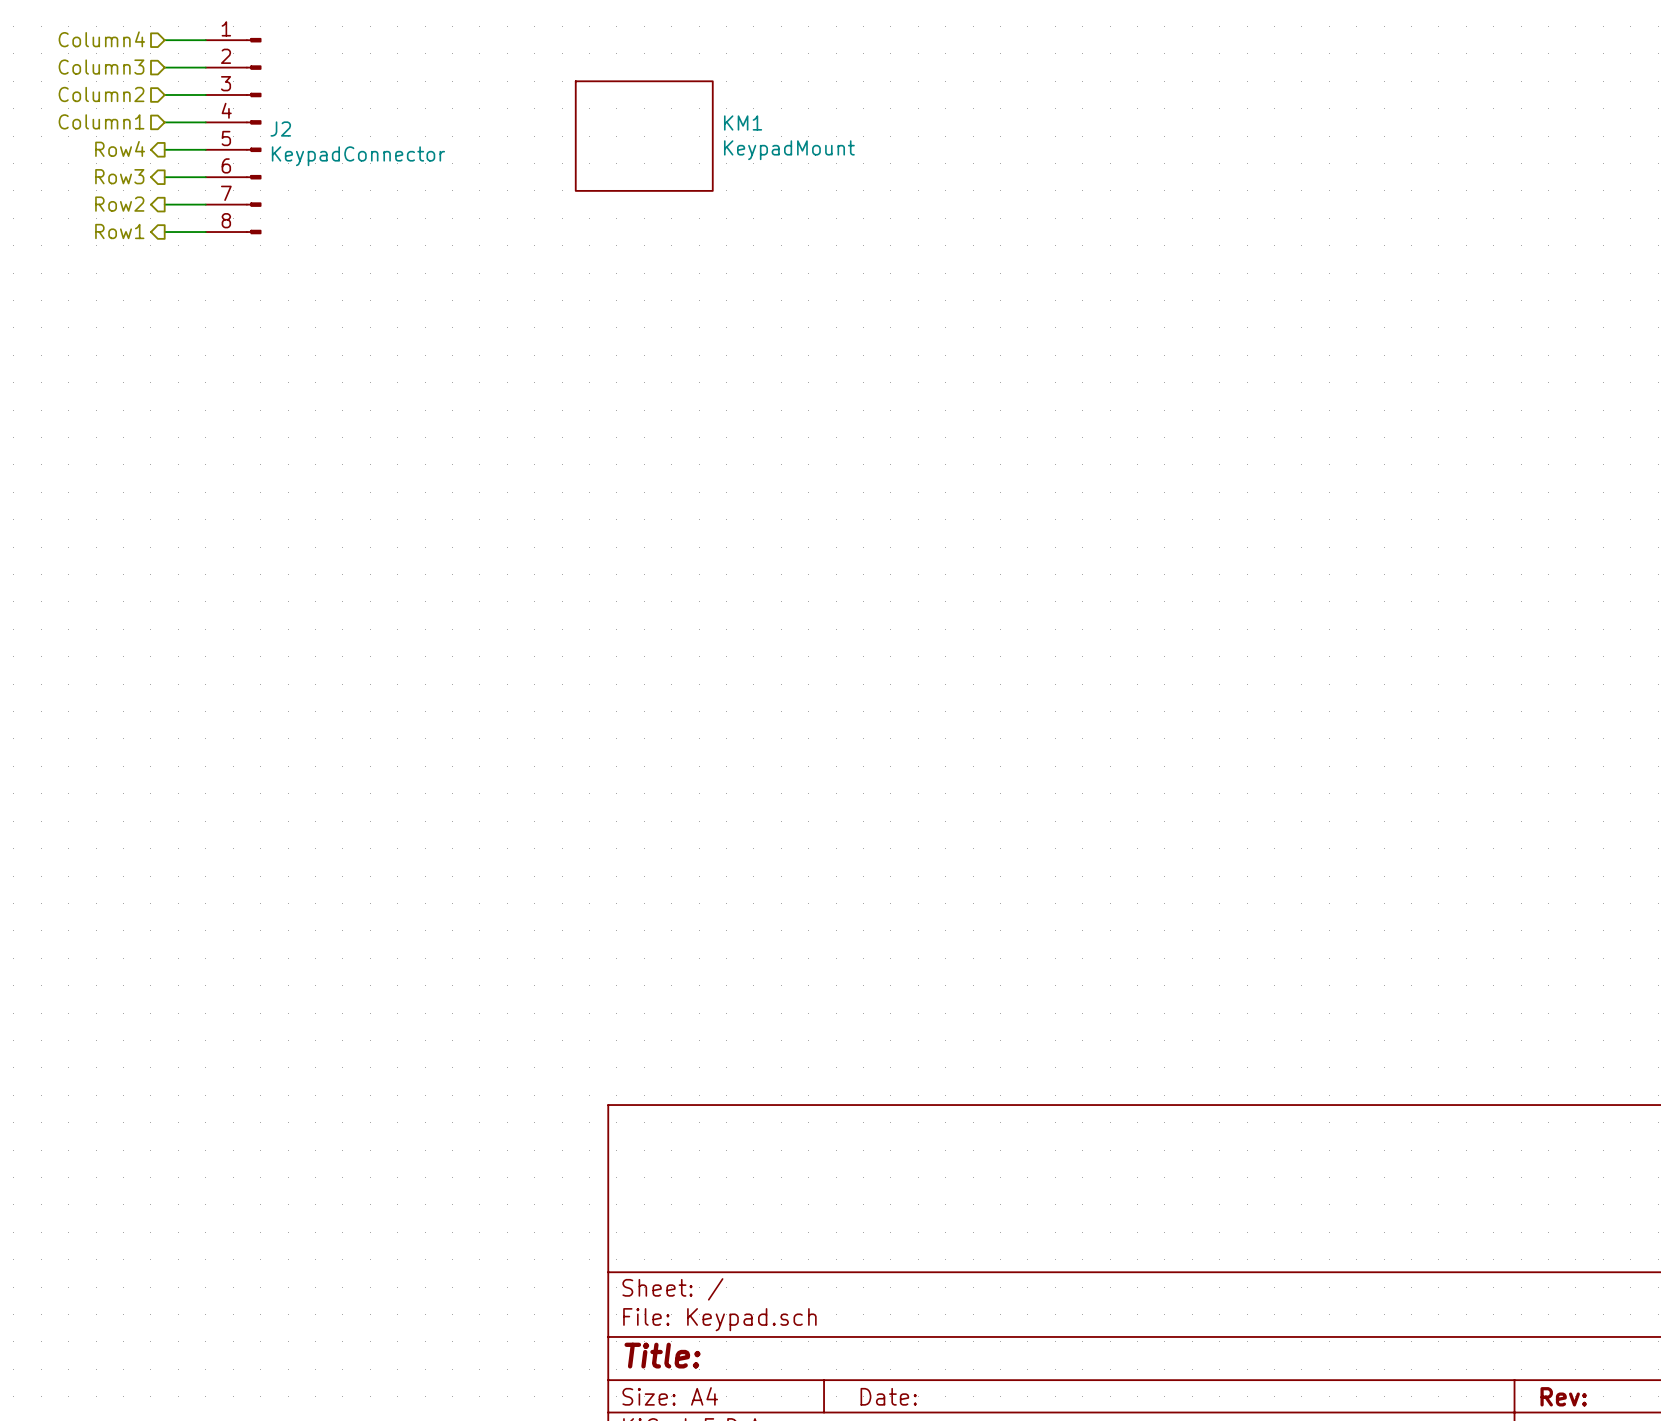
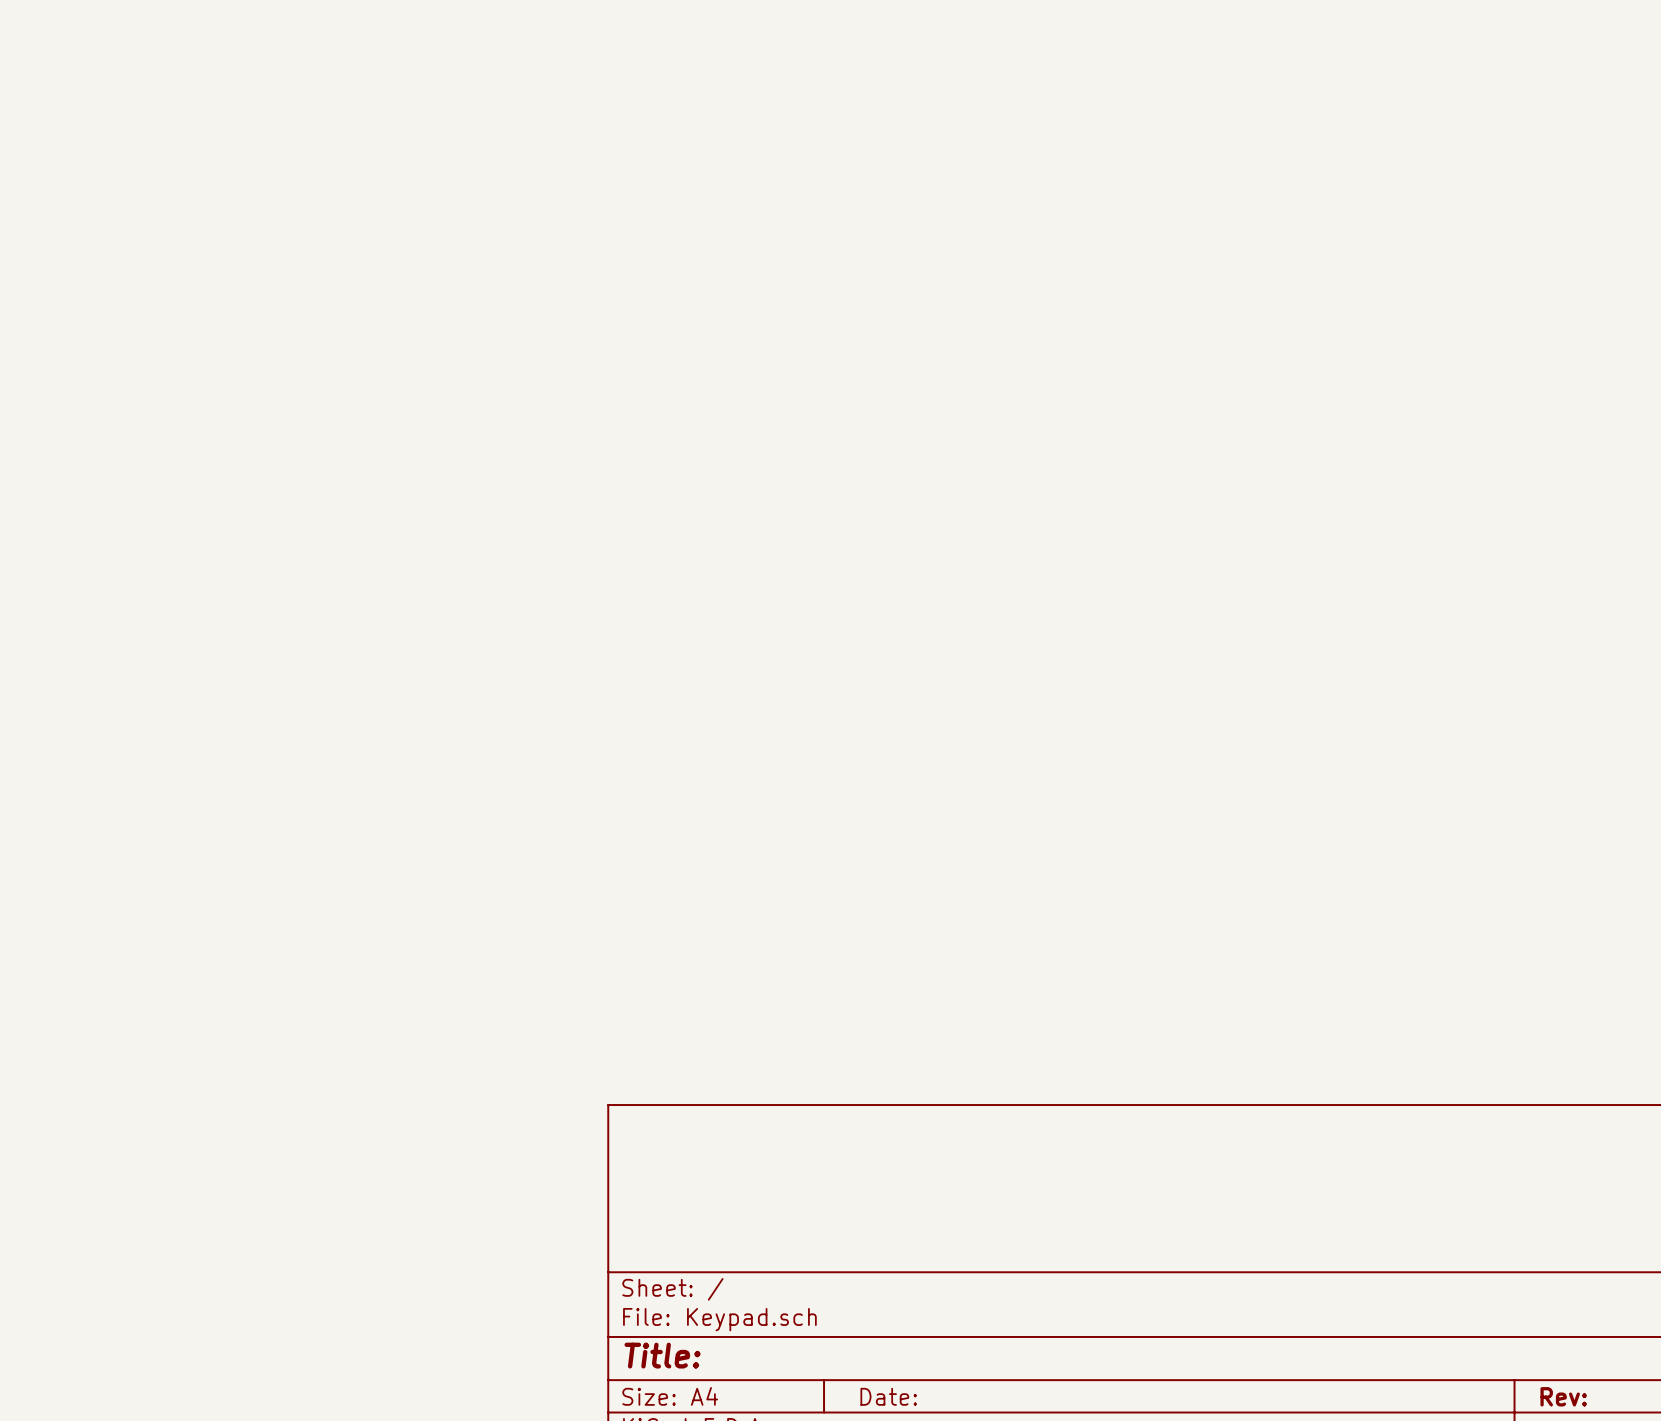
hierarchical label: Column4 (101, 39) -> none
wire: (164, 40) (205, 40) -> none
hierarchical label: Column3 (101, 67) -> none
wire: (164, 67) (205, 67) -> none
hierarchical label: Column2 (101, 94) -> none
wire: (164, 94) (205, 94) -> none
hierarchical label: Column1 (101, 121) -> none
wire: (164, 122) (205, 122) -> none
J2: KeypadConnector (233, 136) -> none
KM1: KeypadMount (644, 136) -> none
hierarchical label: Row4 (120, 148) -> none
wire: (164, 149) (205, 149) -> none
hierarchical label: Row3 (119, 176) -> none
wire: (164, 177) (205, 177) -> none
hierarchical label: Row2 (119, 204) -> none
wire: (164, 204) (205, 204) -> none
hierarchical label: Row1 (119, 231) -> none
wire: (164, 232) (205, 232) -> none

